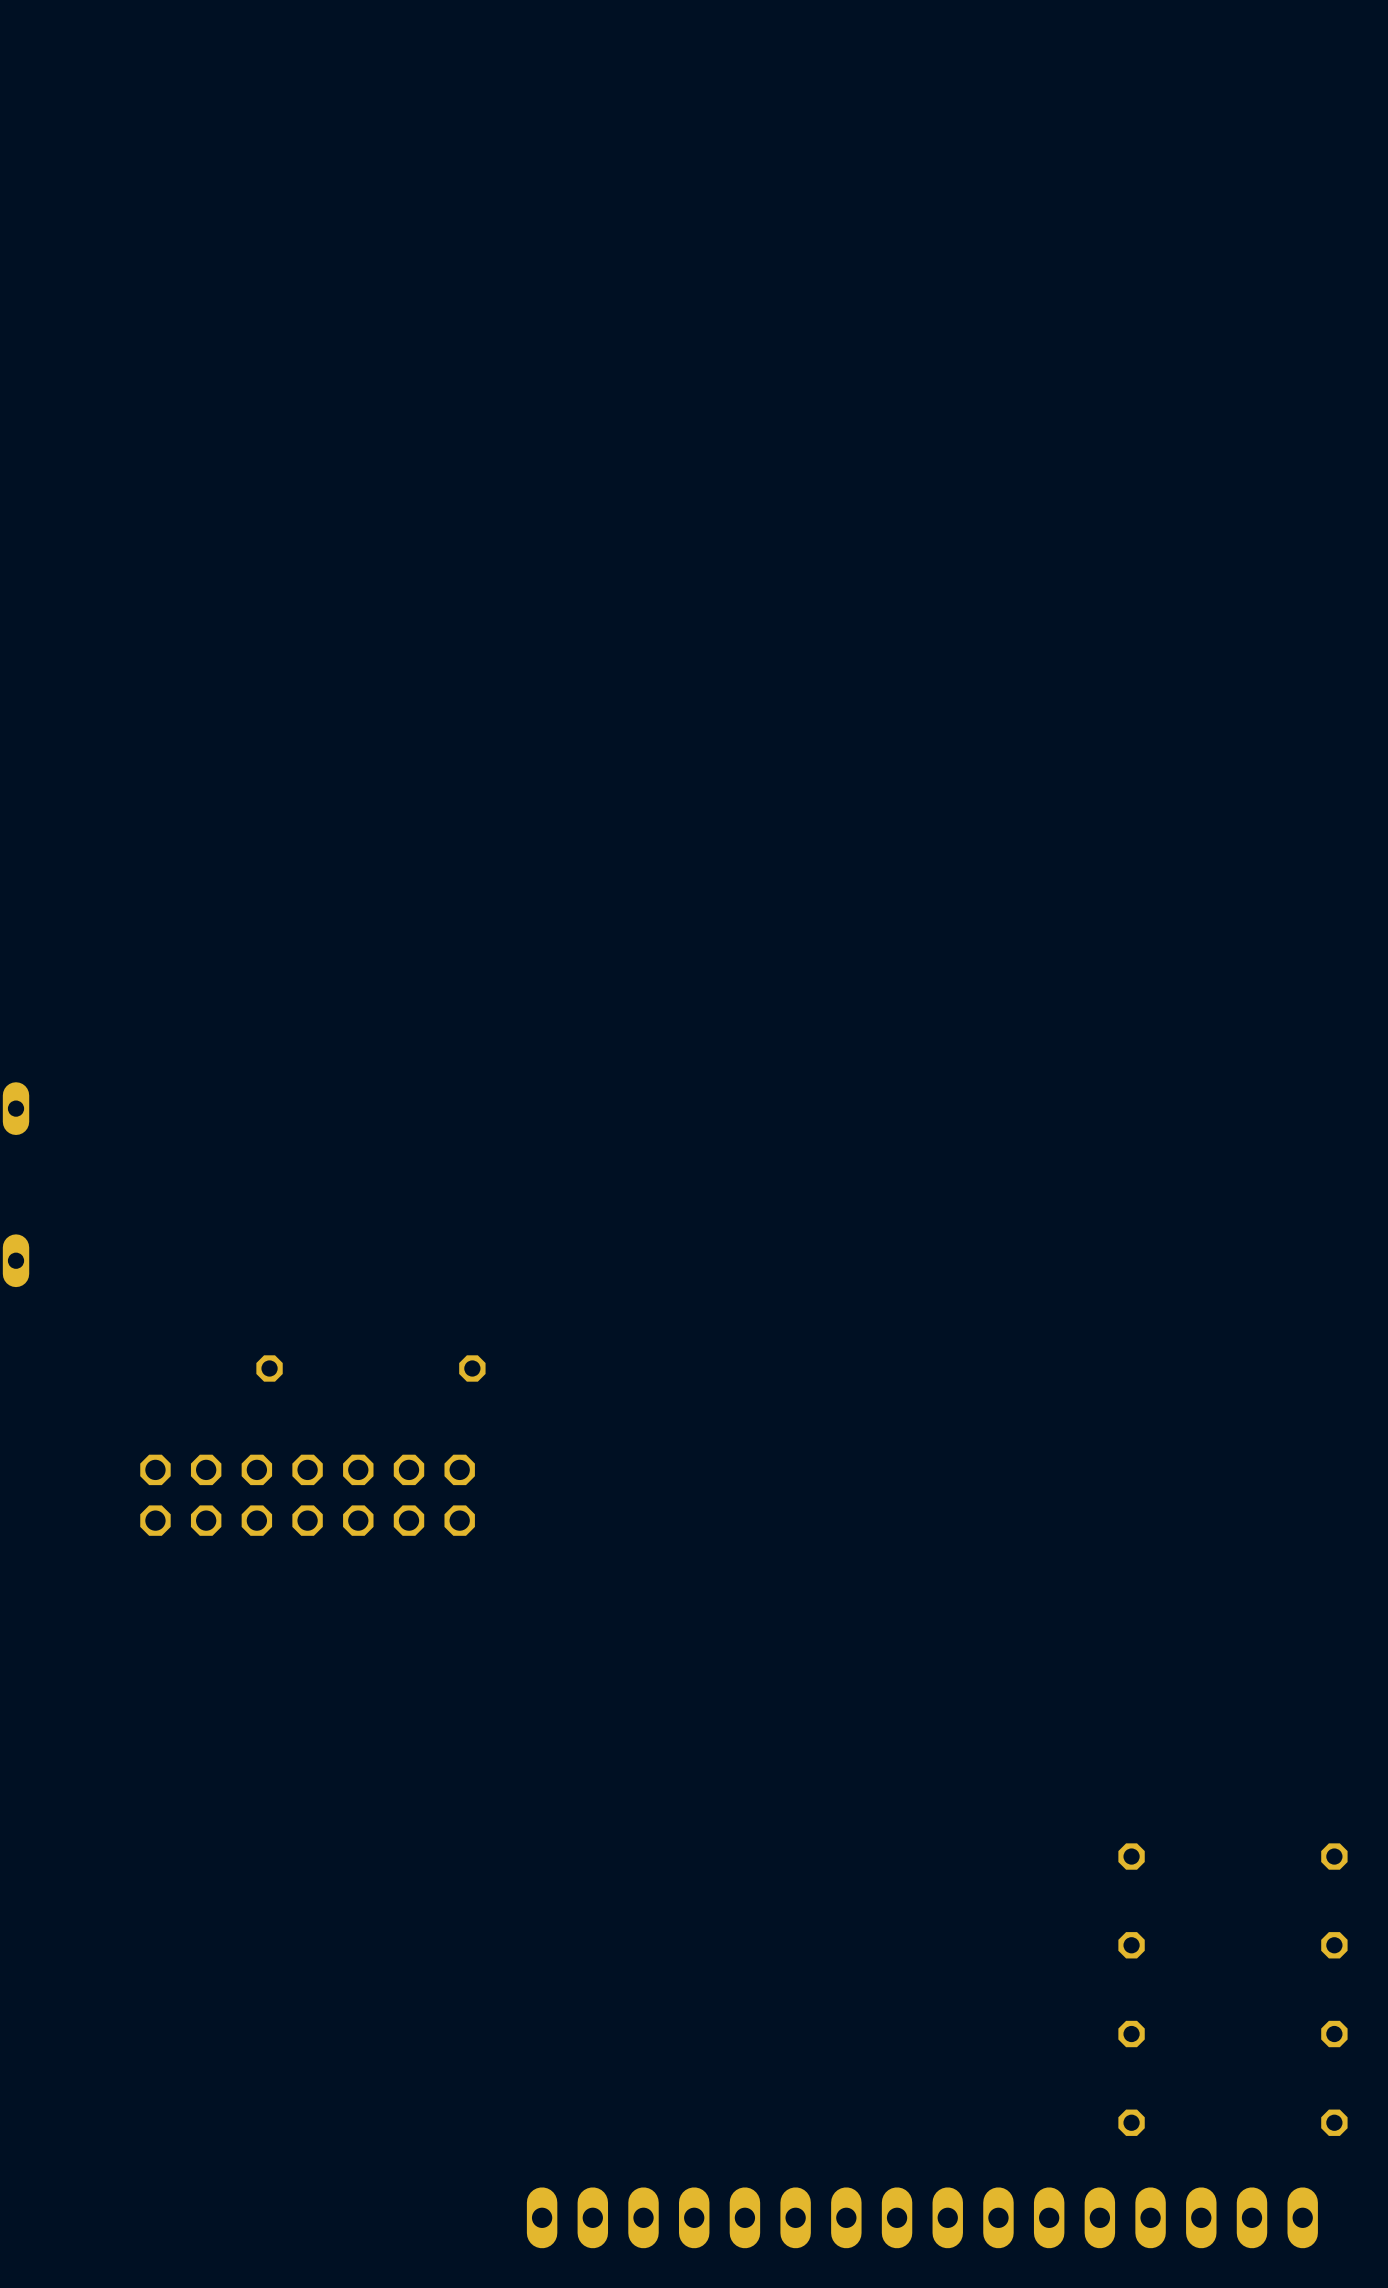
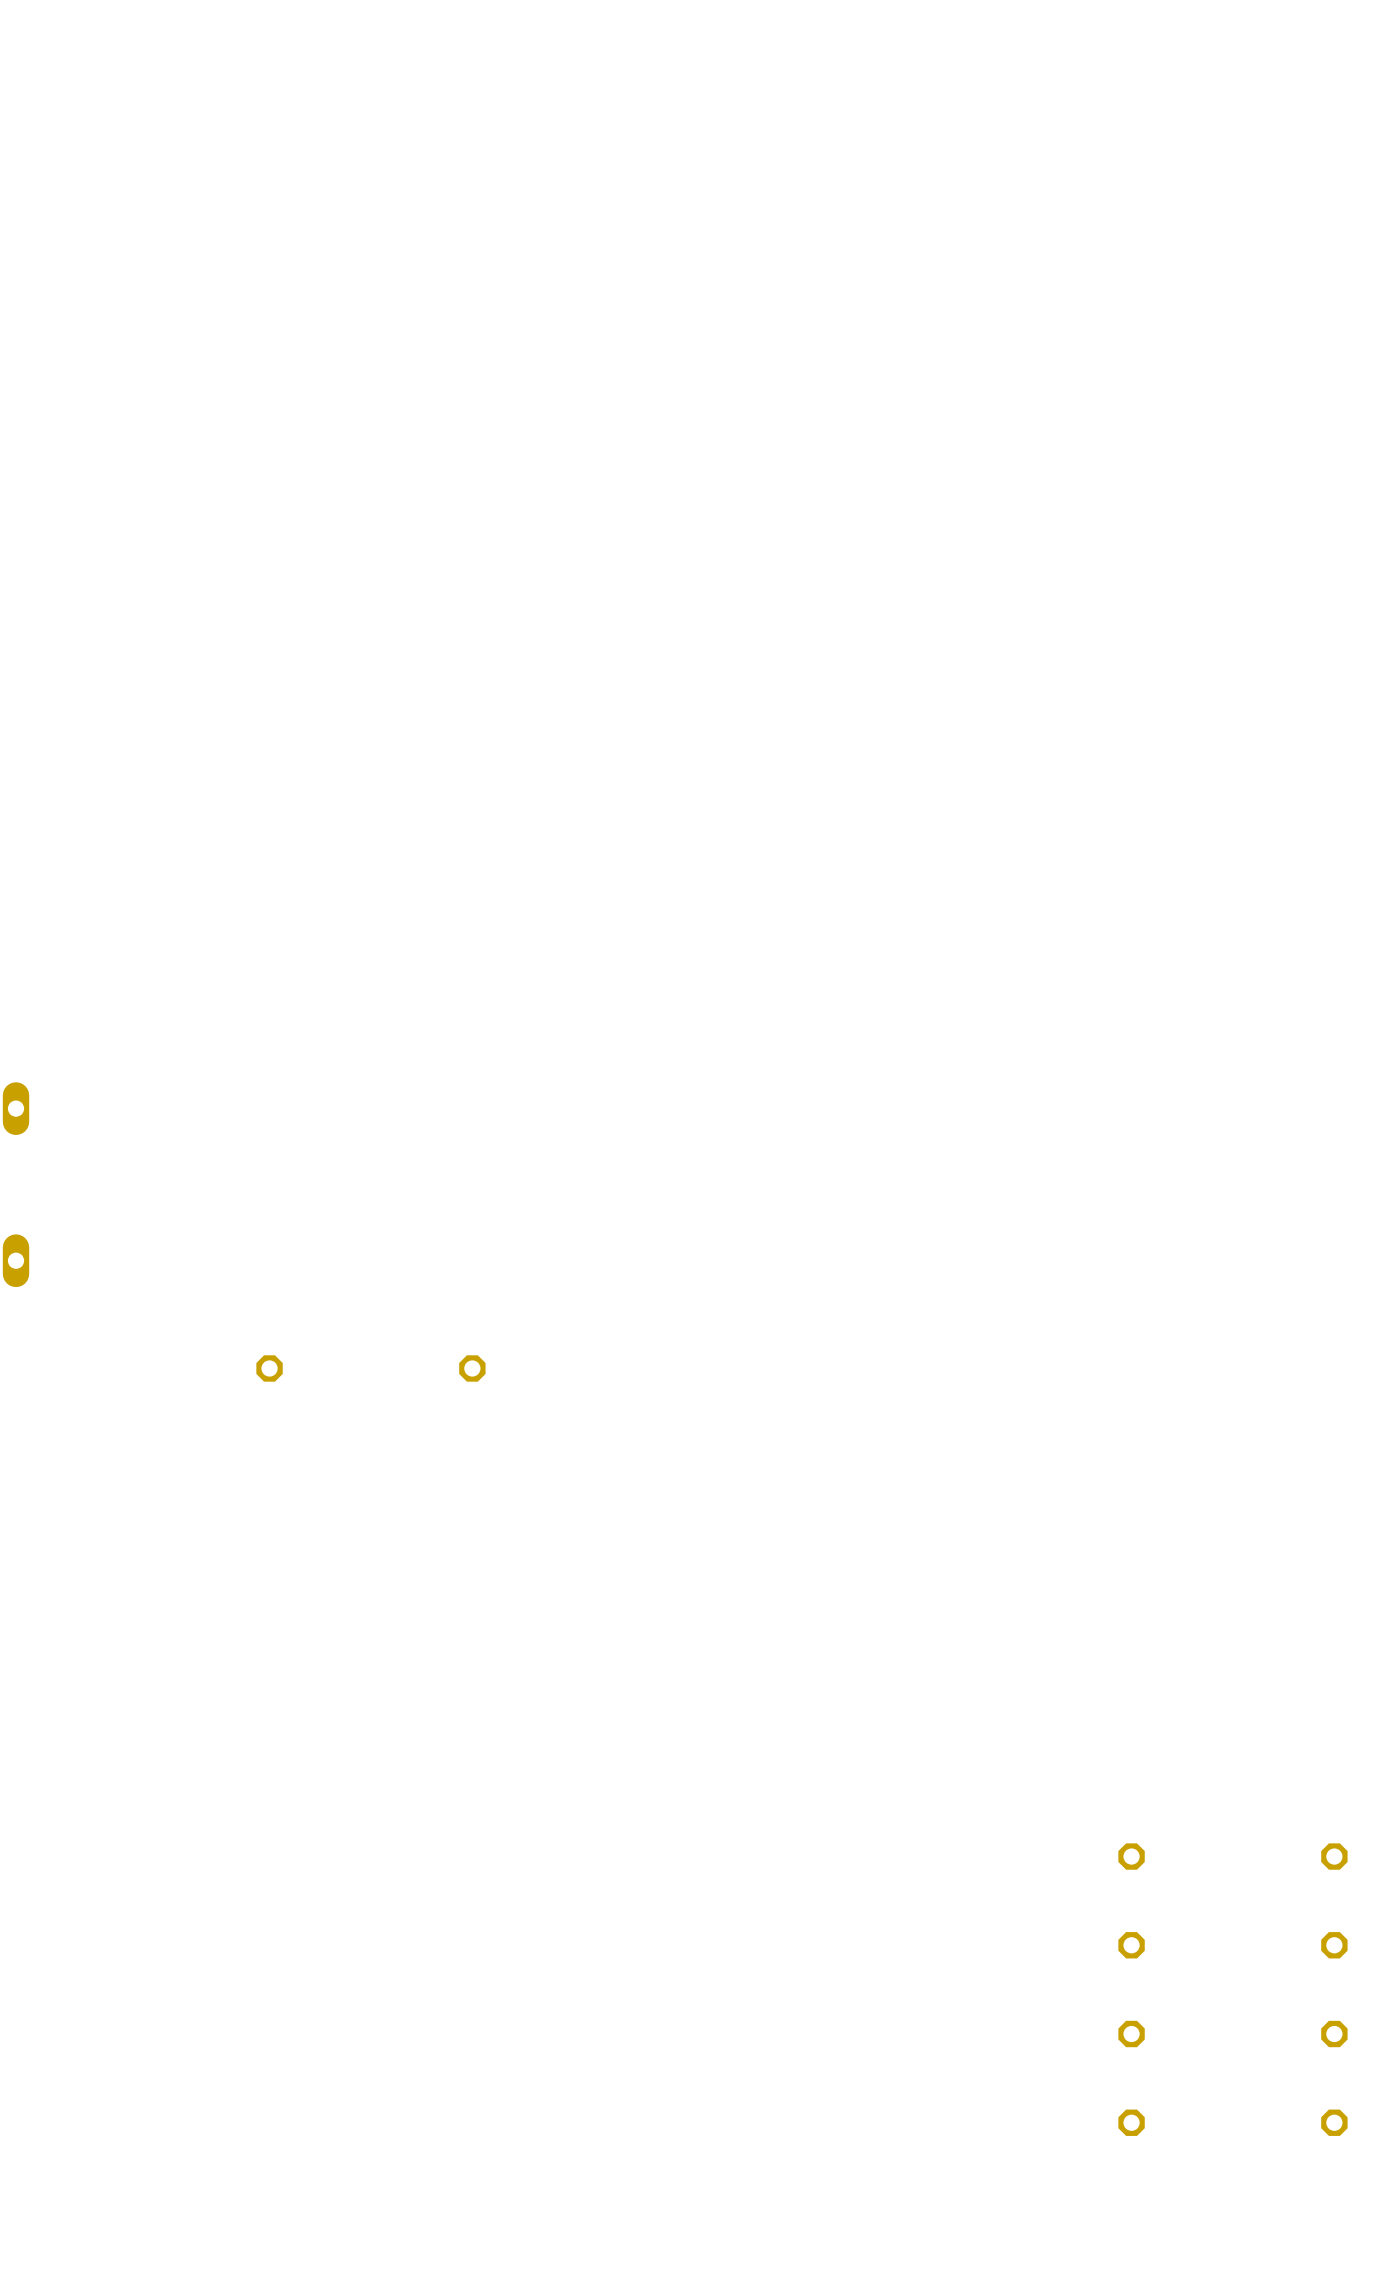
part: (307, 1495) -> none
part: (922, 2217) -> none

